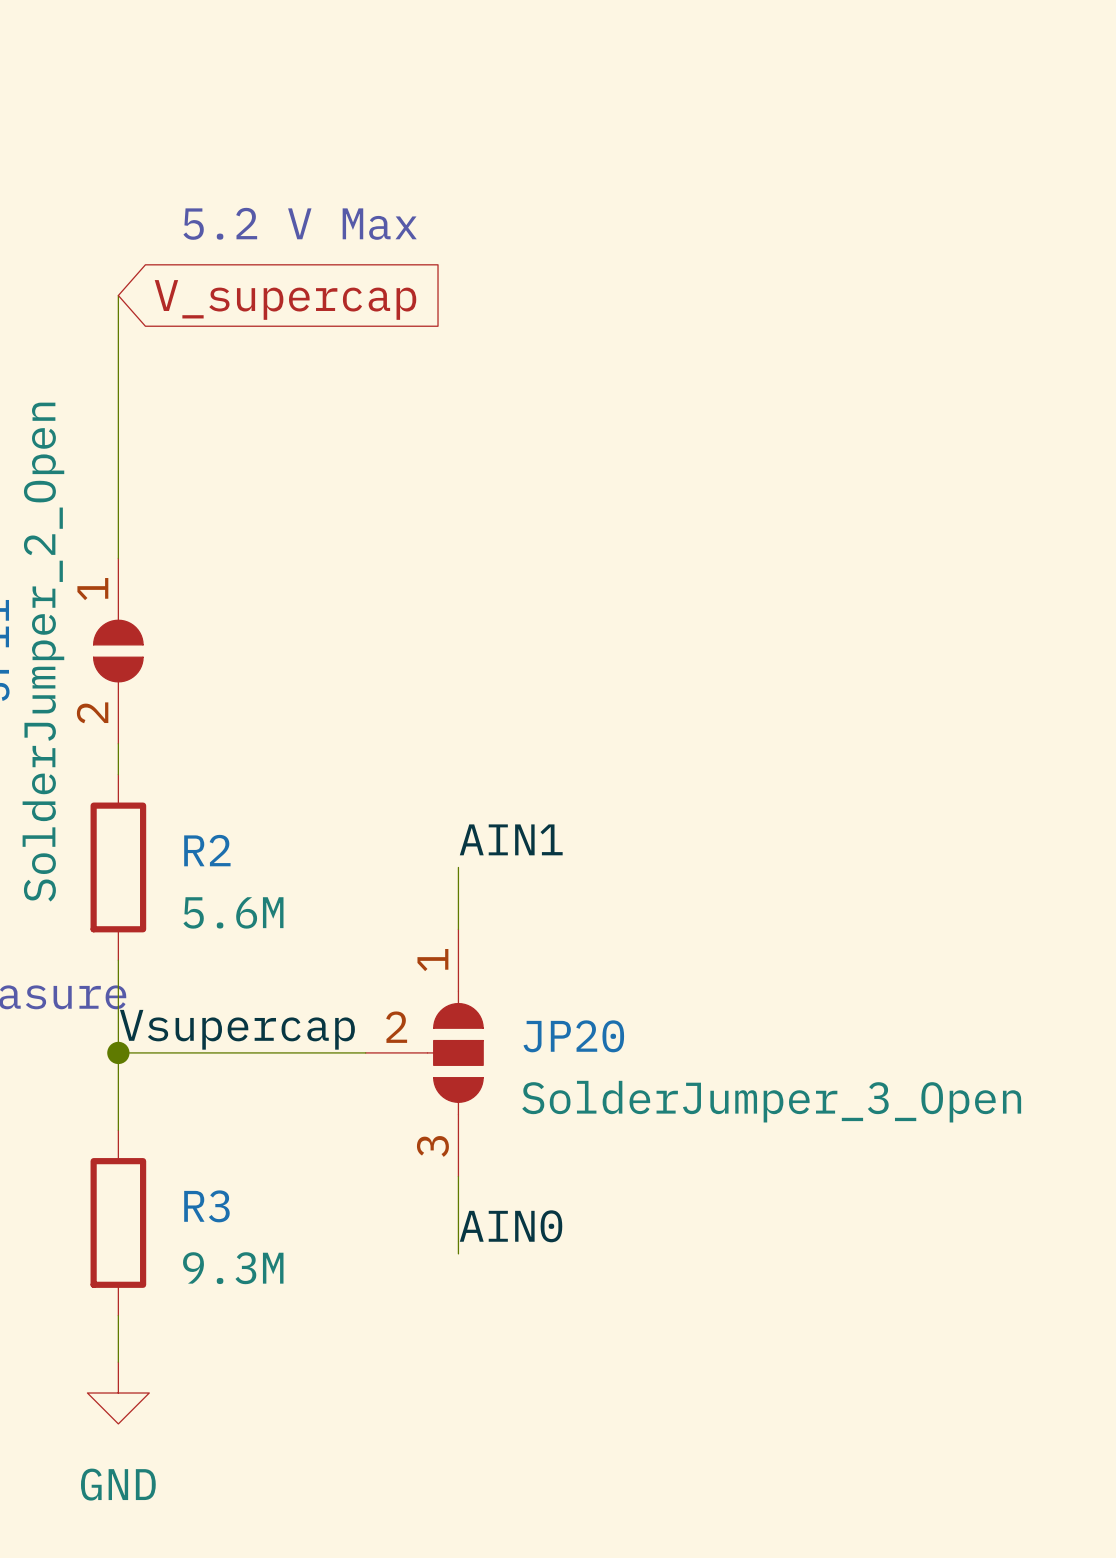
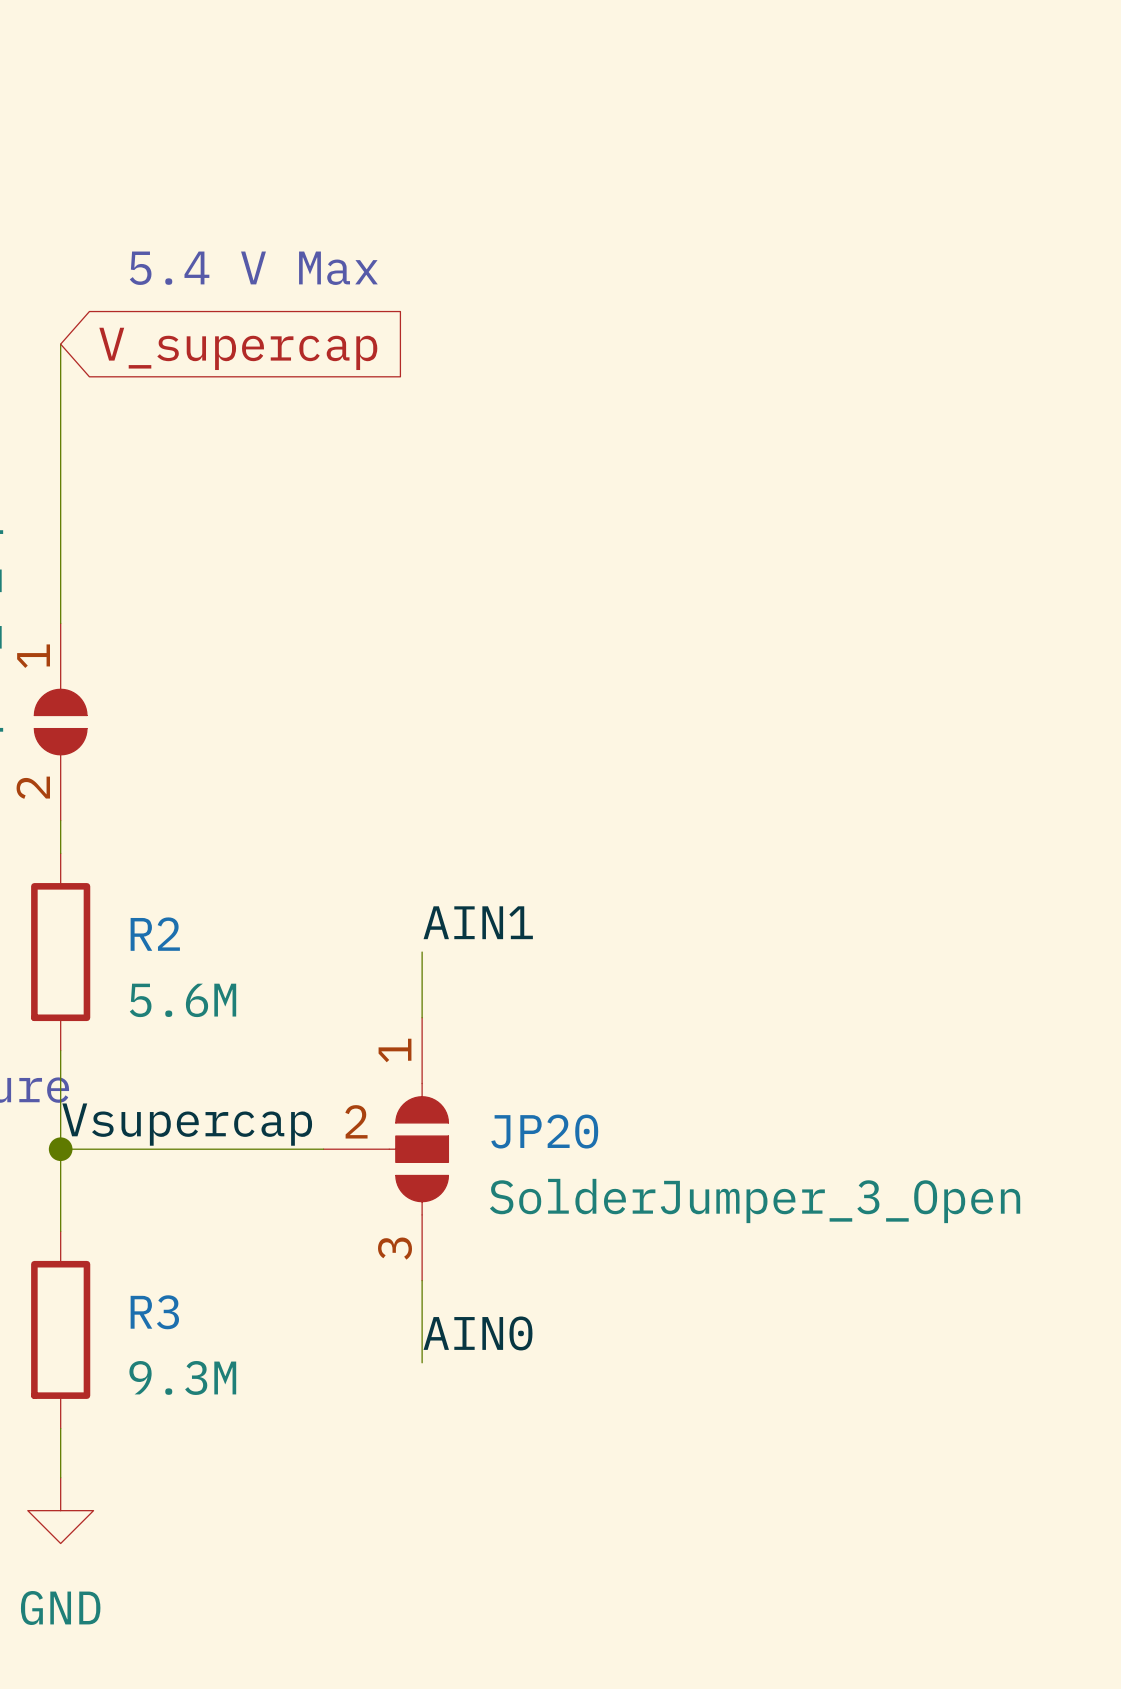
text: 5.2 V Max (300, 223) -> 5.4 V Max (253, 268)

